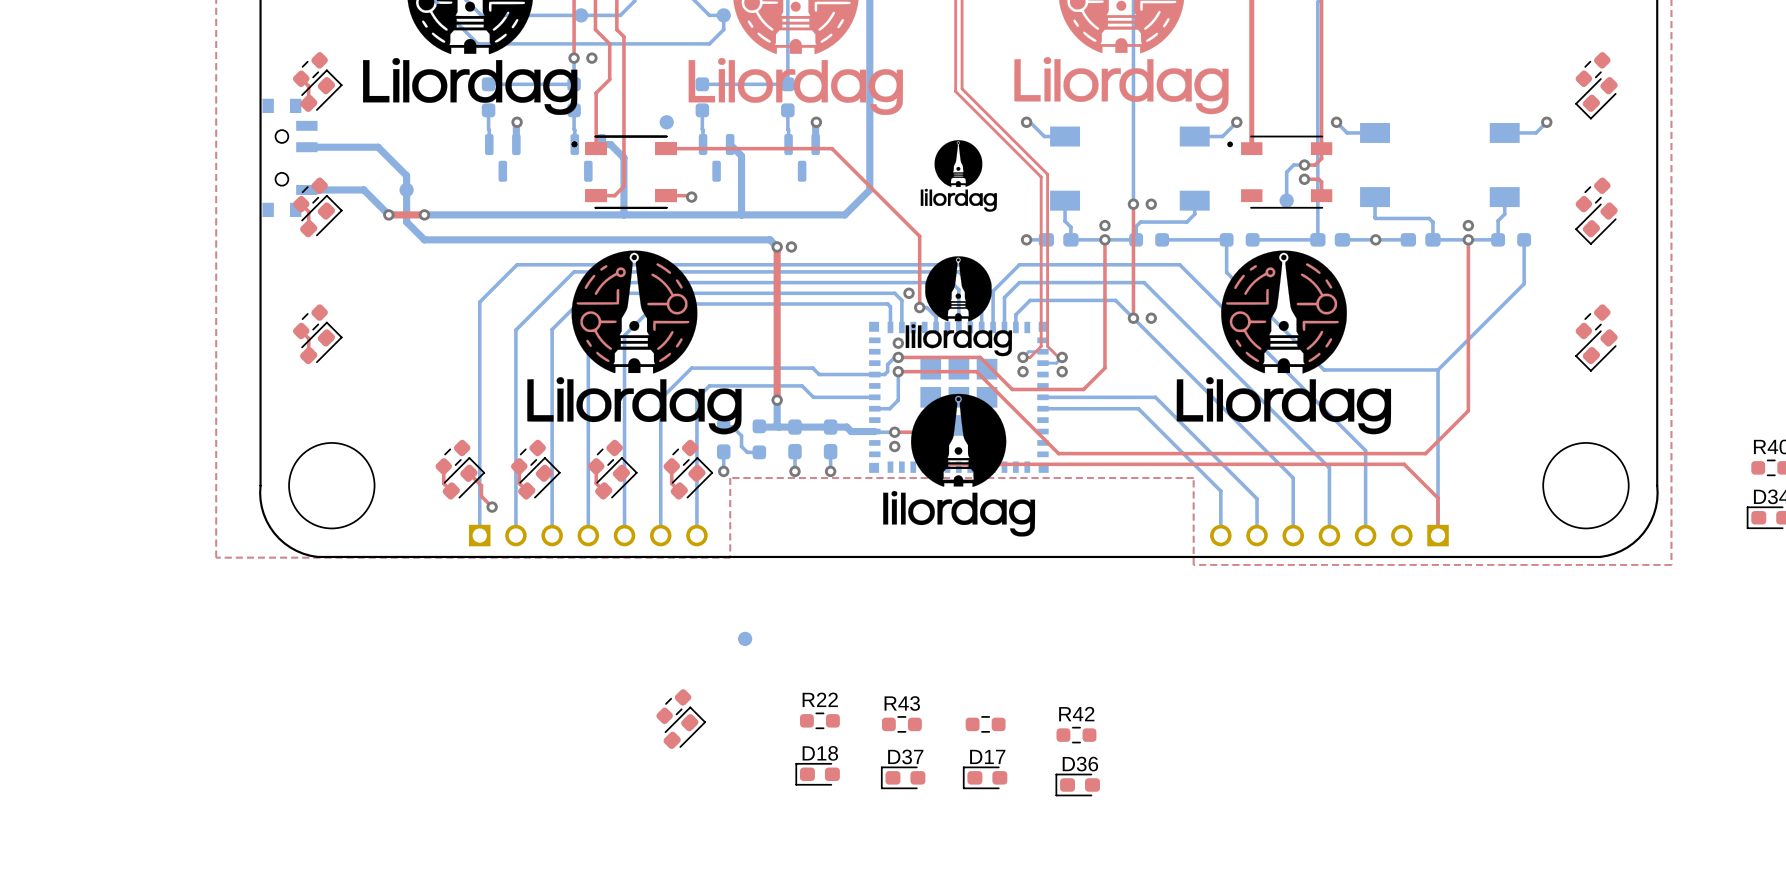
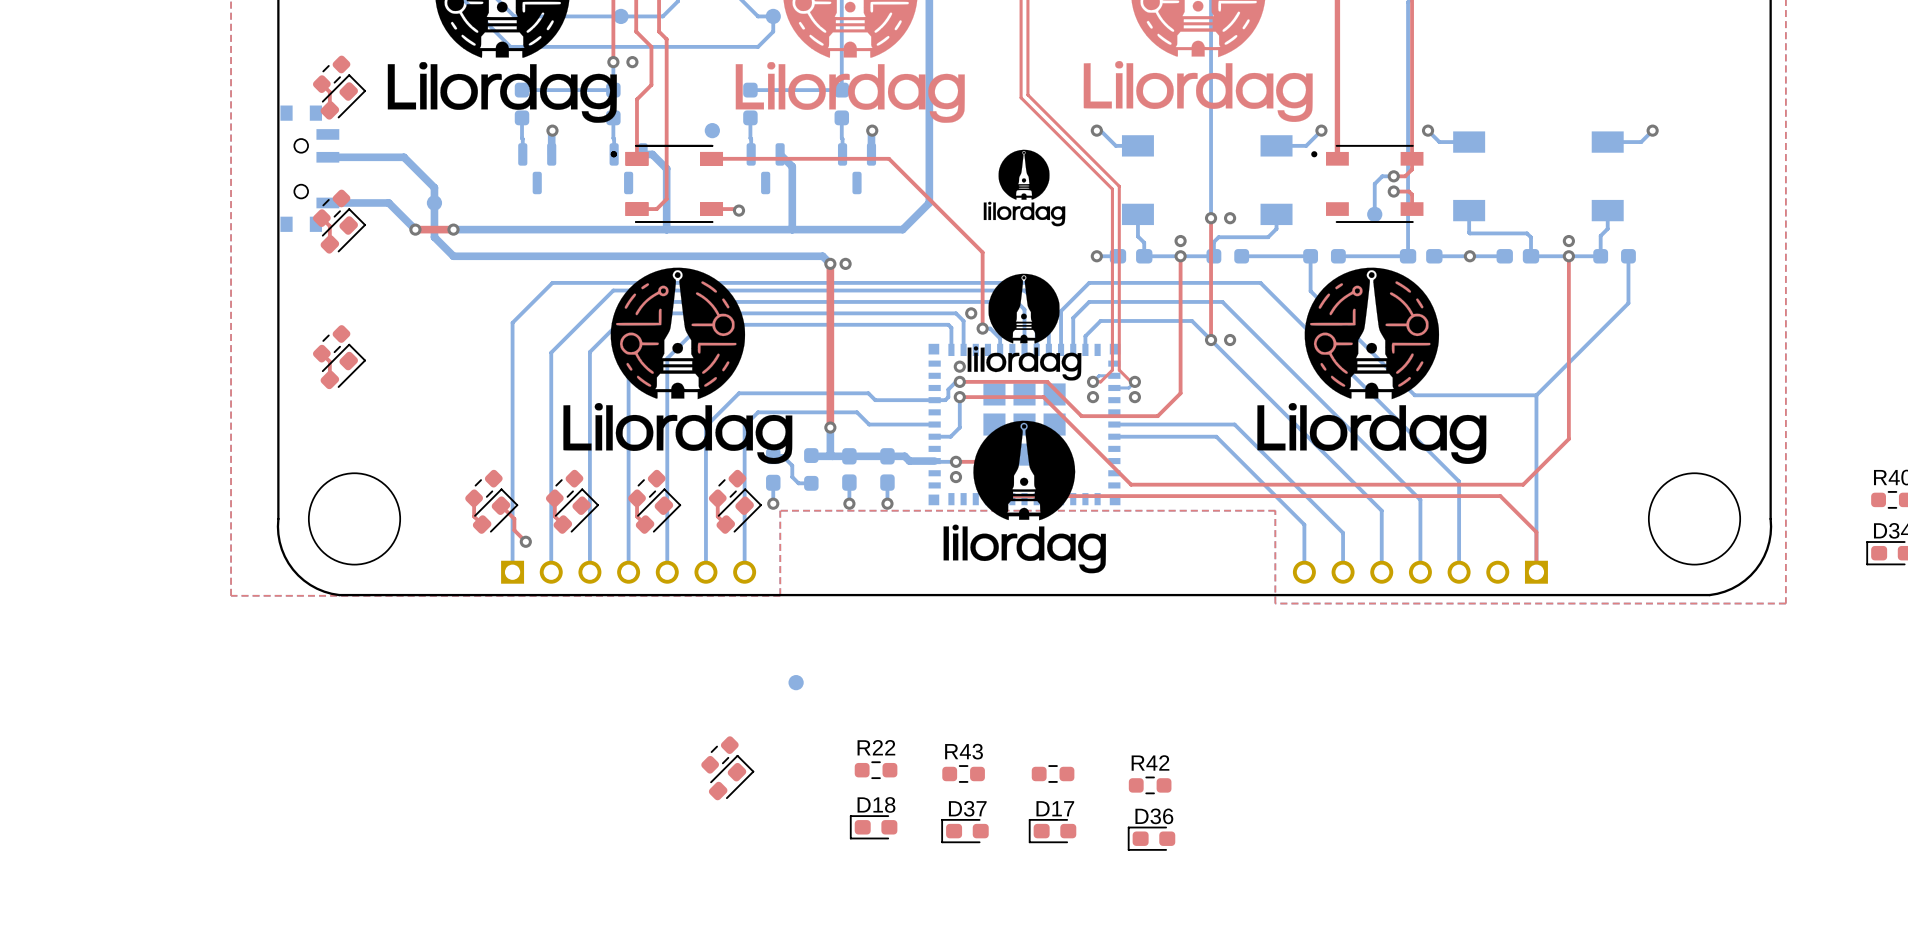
part: (1593, 69) -> none
part: (1596, 98) -> none
part: (1593, 194) -> none
part: (1596, 223) -> none
part: (1593, 321) -> none
part: (1596, 350) -> none

